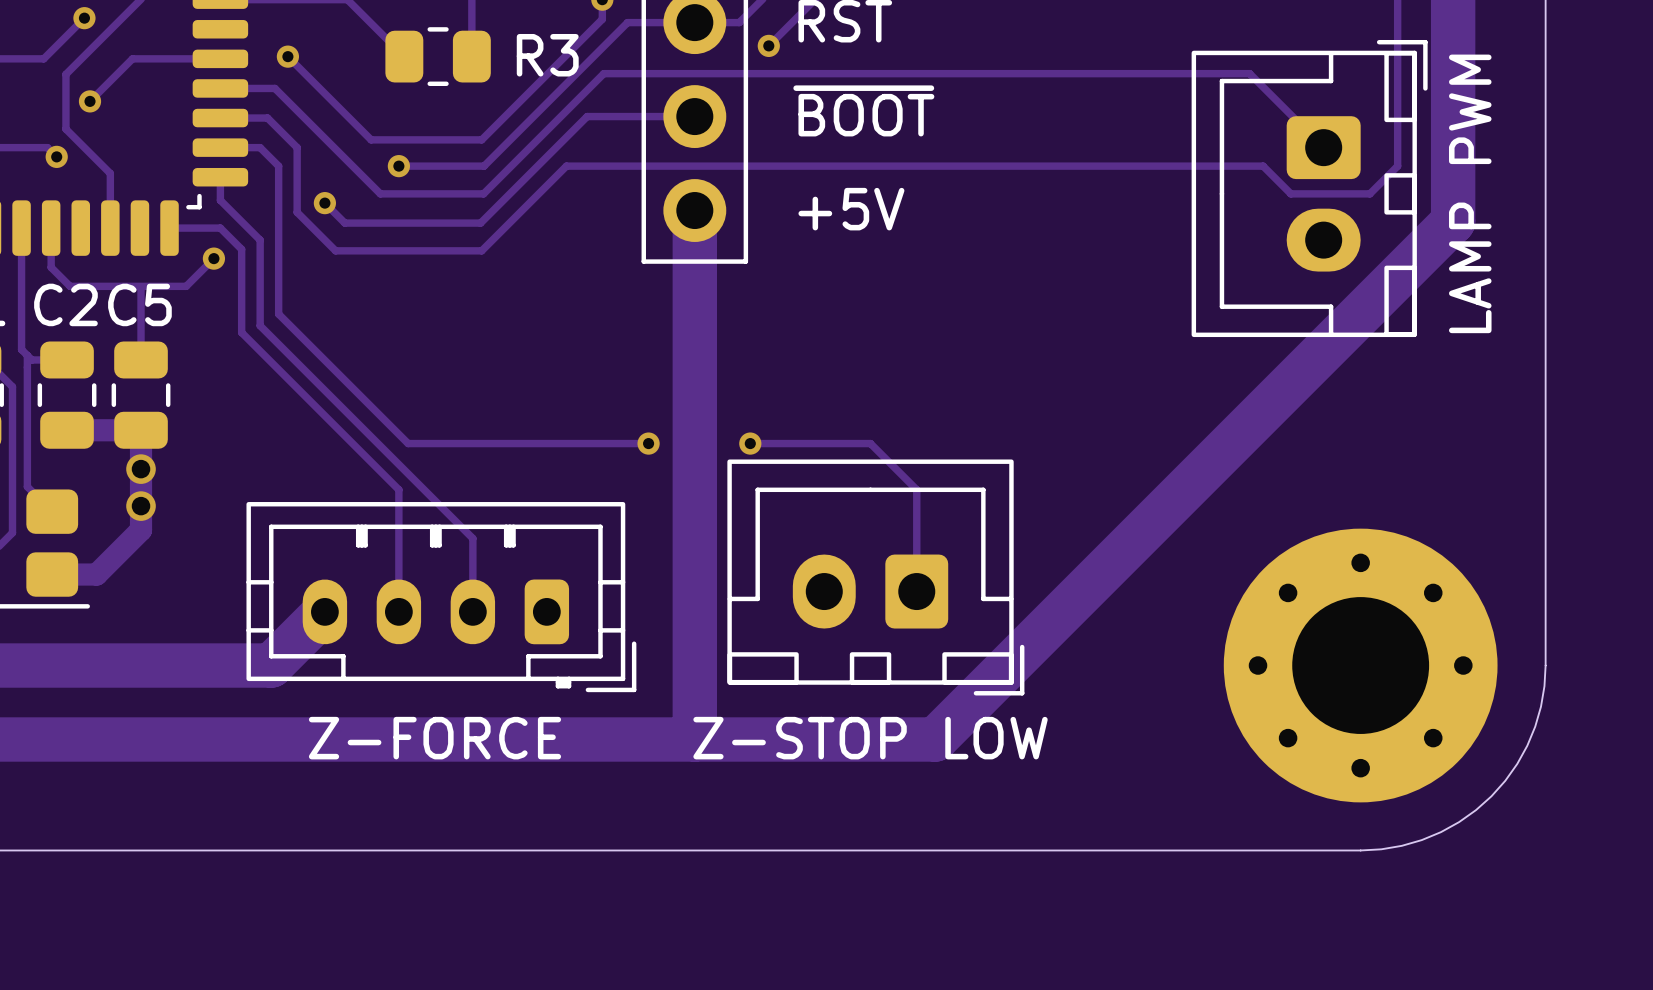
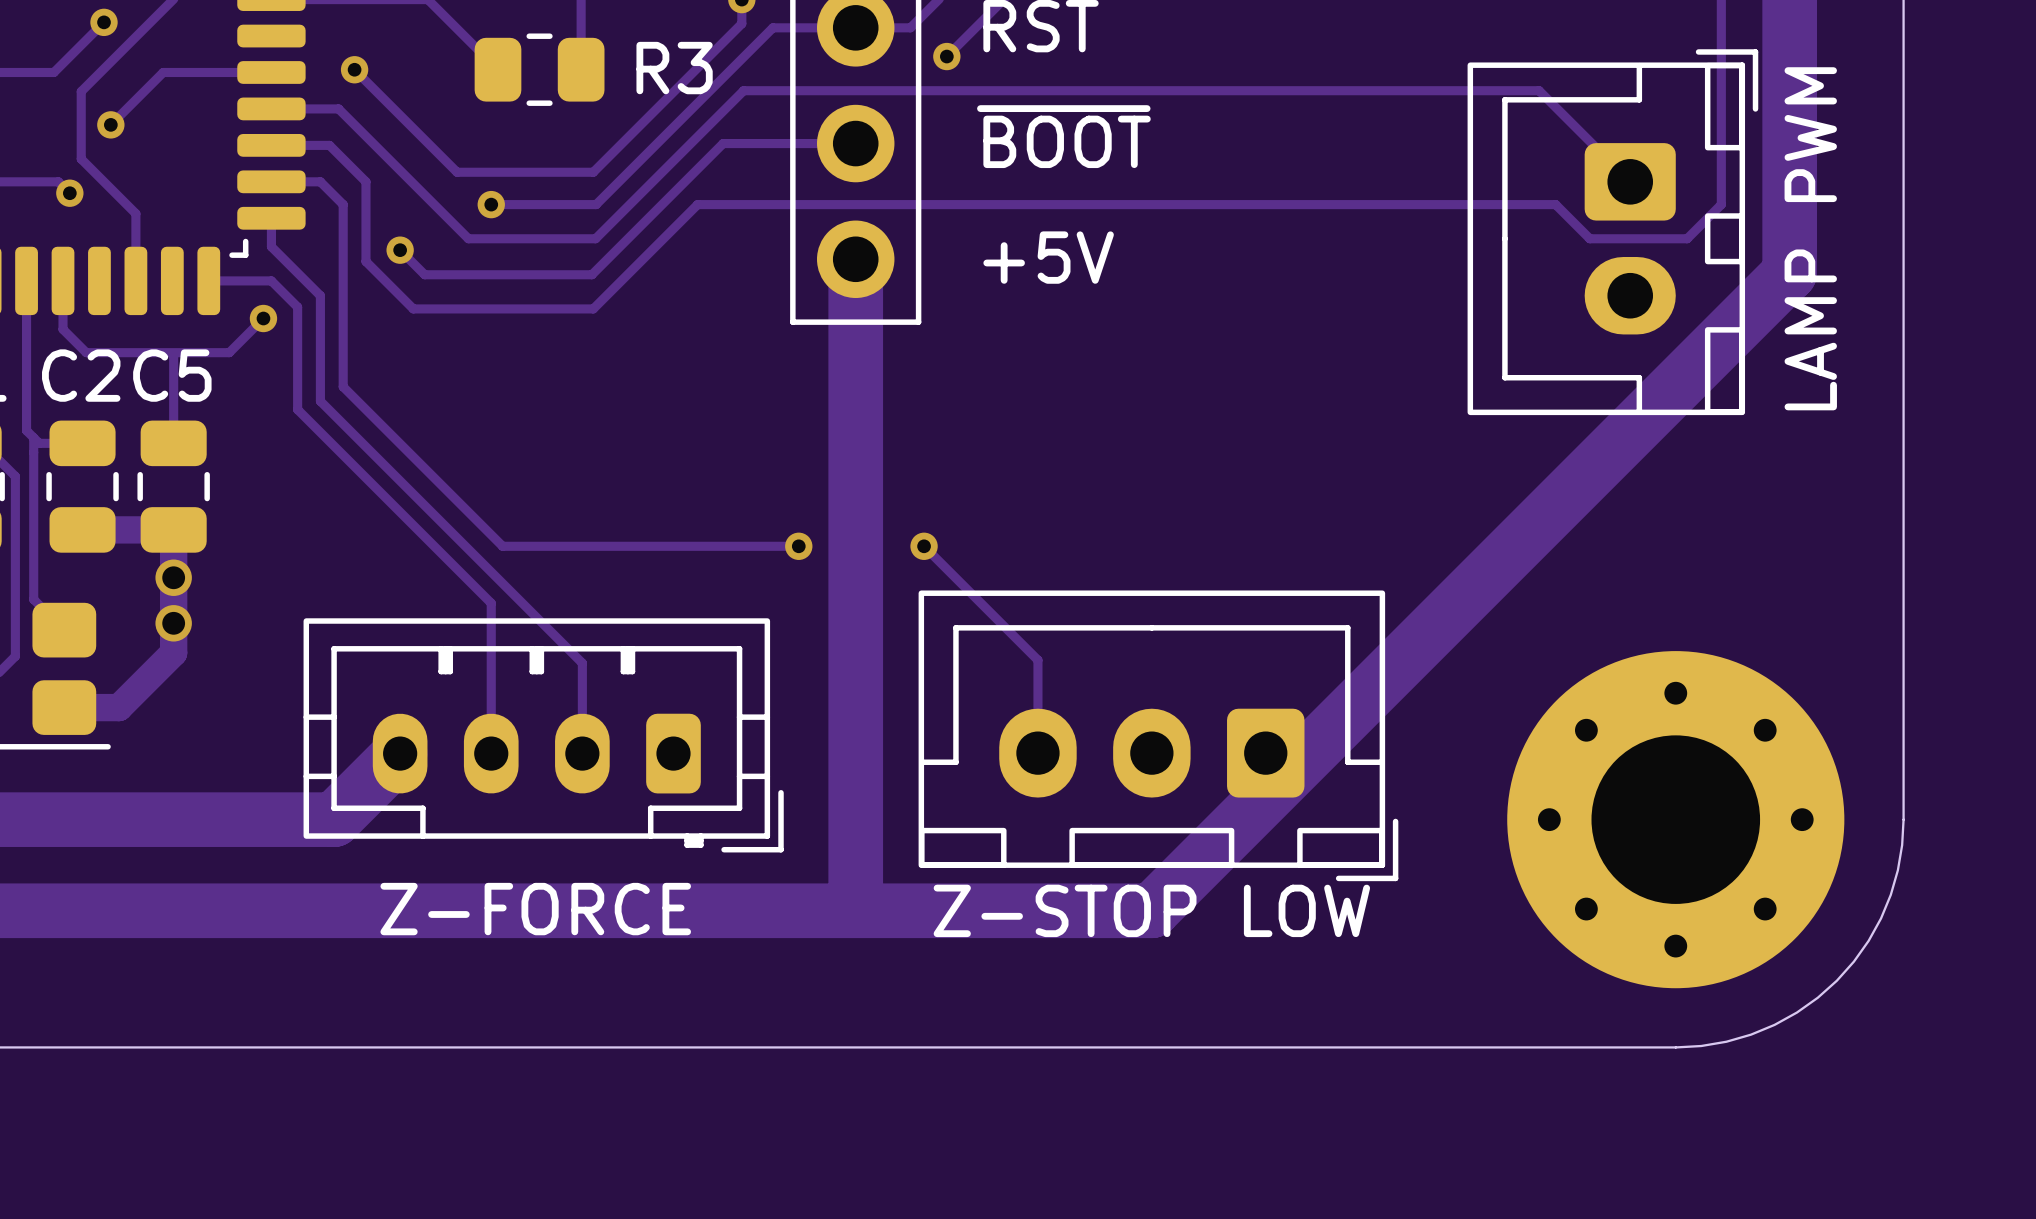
track: (750, 443) (870, 443) (916, 489) (916, 591) -> (924, 546) (1037, 660) (1037, 753)
part: Z-STOP LOW (875, 577) -> none
part: none -> Z-STOP LOW (1158, 735)

